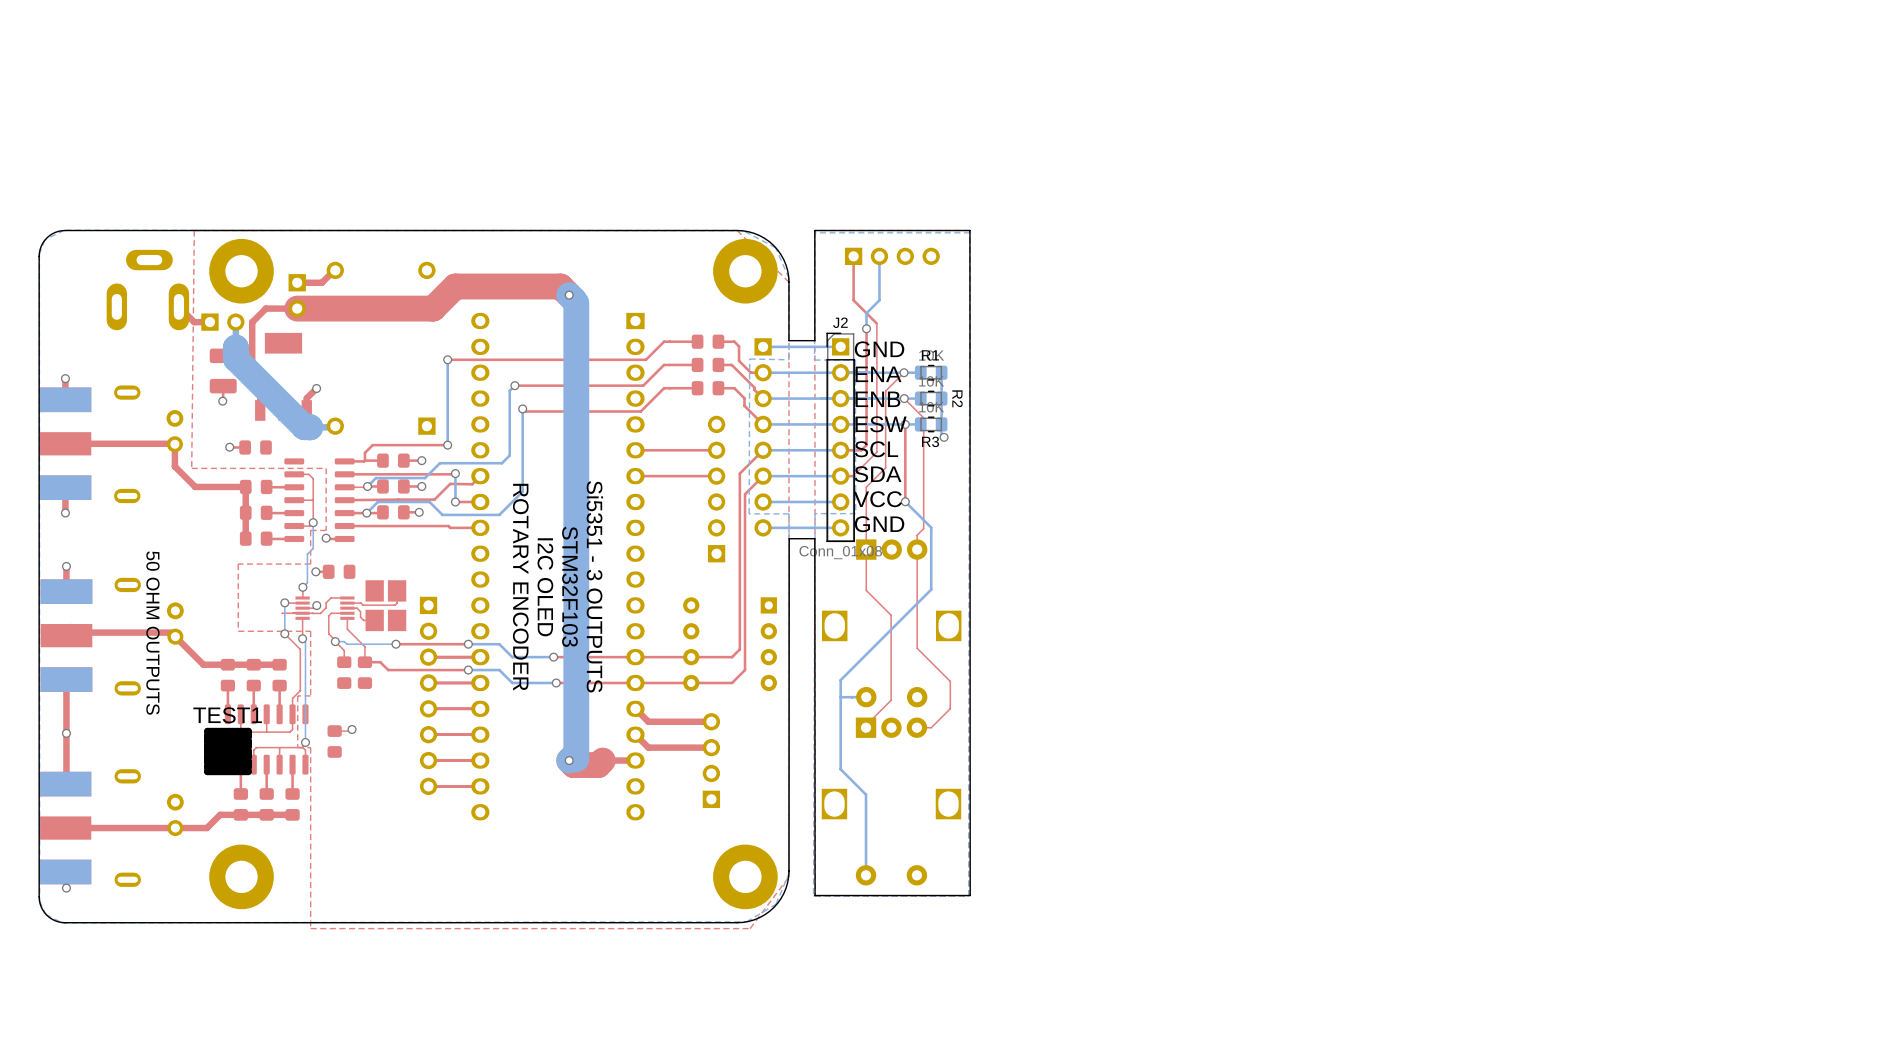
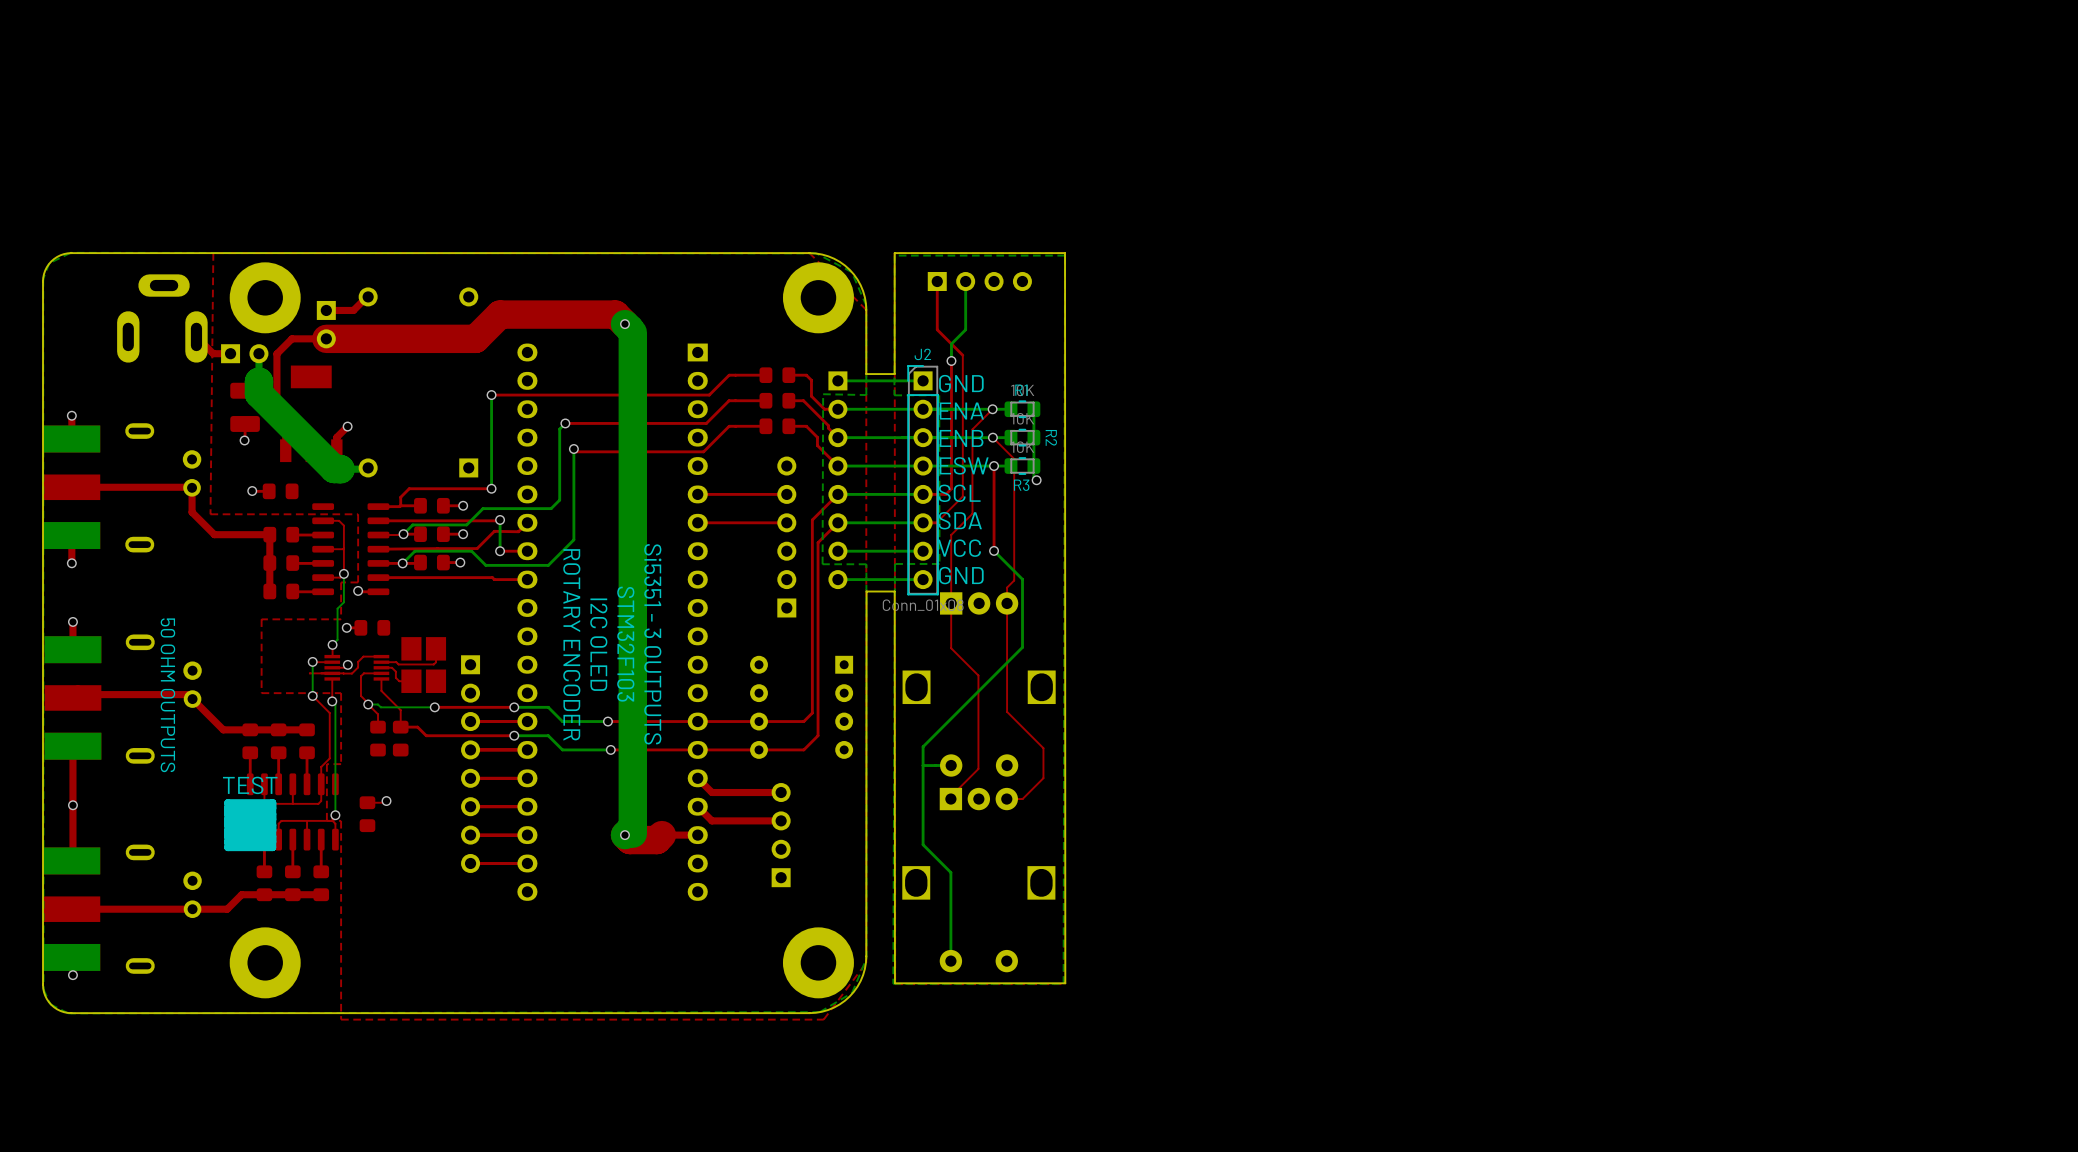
TEST1 name: TEST1 (227, 715) -> TEST (250, 785)

